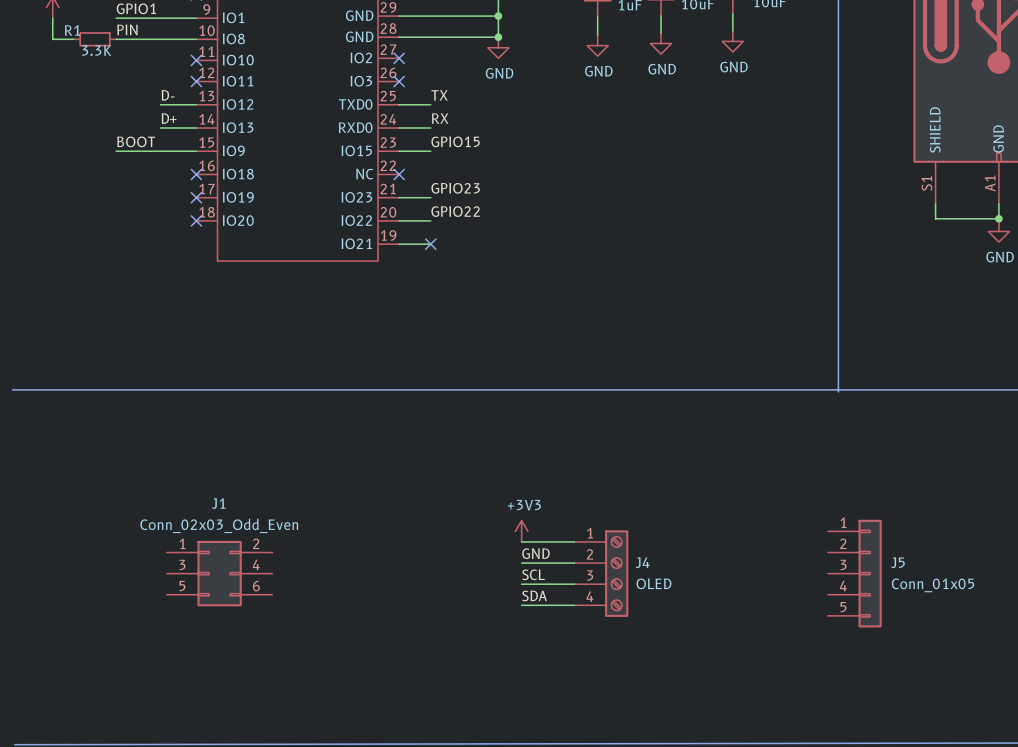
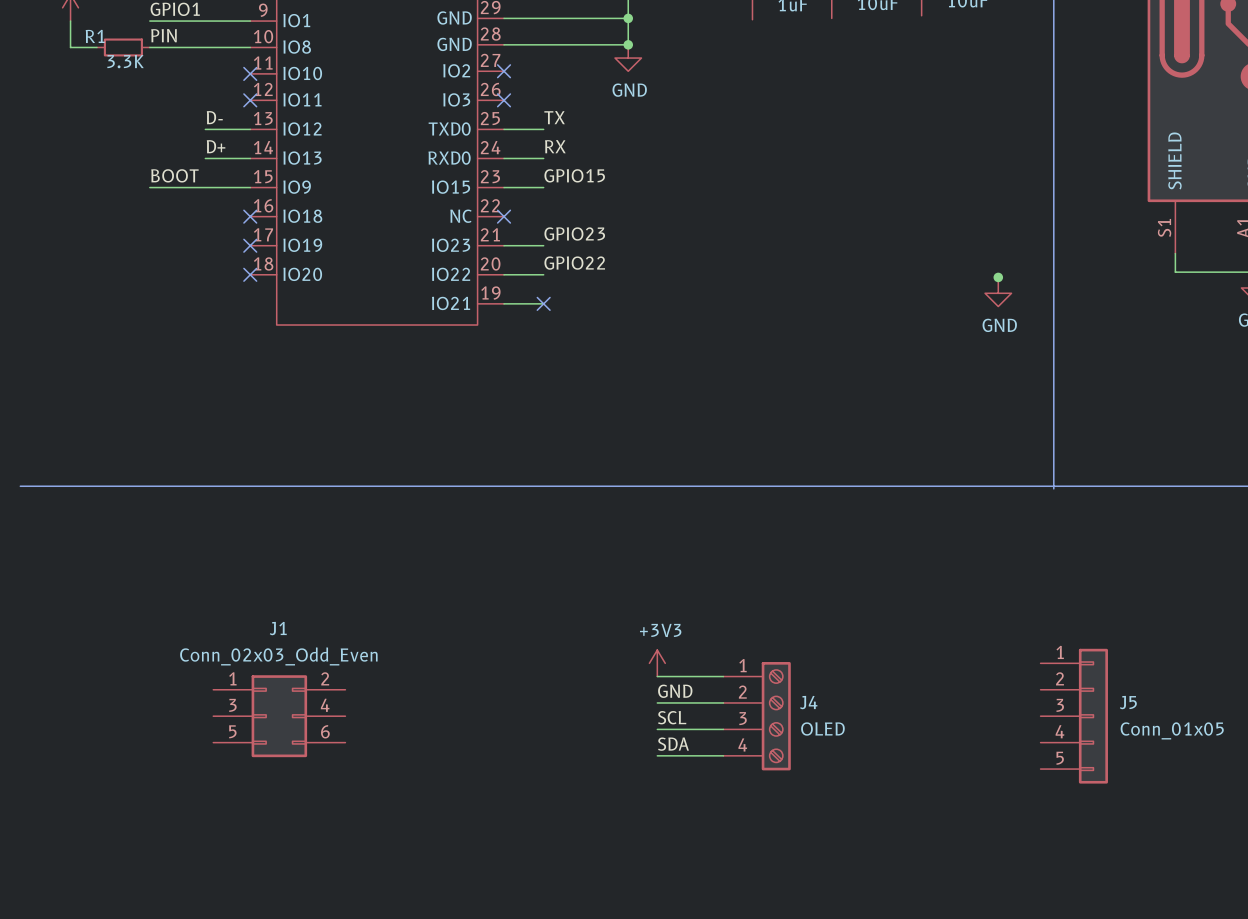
wire: (732, 13) (732, 30) -> none
wire: (661, 16) (661, 32) -> none
wire: (597, 17) (597, 35) -> none
power symbol: GND (732, 41) -> none
power symbol: GND (661, 43) -> none
power symbol: GND (597, 45) -> none
junction: none -> (998, 277)
power symbol: none -> GND (998, 293)

